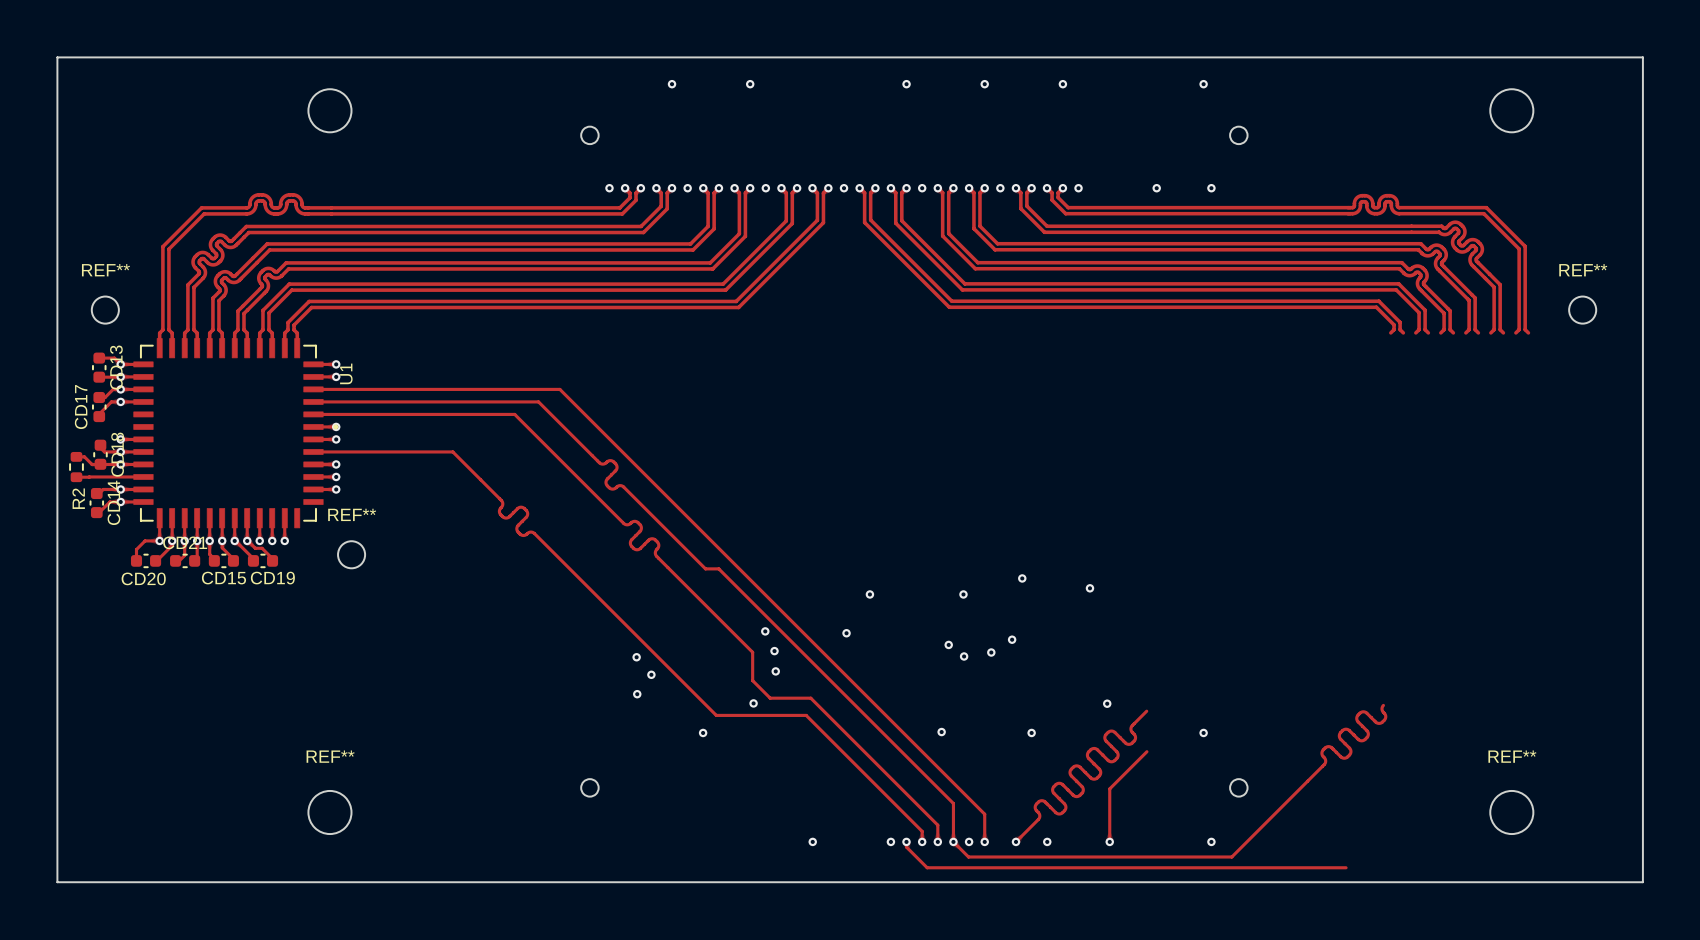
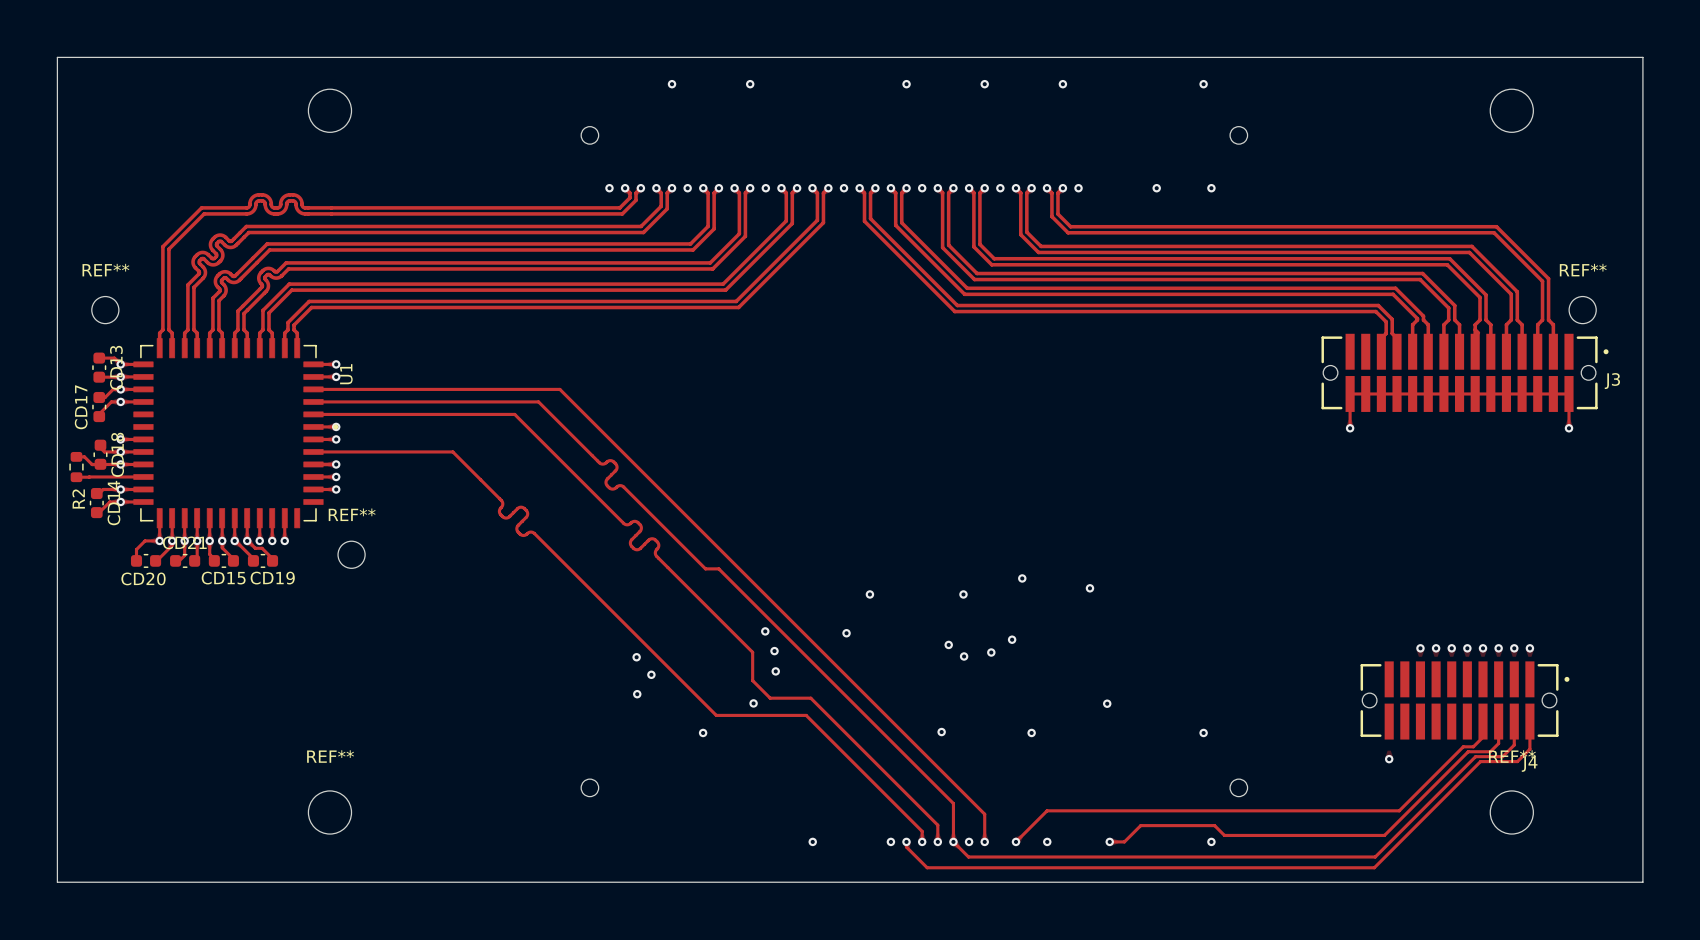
track: (859, 187) (864, 192) (864, 222) (949, 307) (1376, 307) (1394, 324) (1394, 329) (1390, 332) -> (859, 188) (864, 193) (864, 221) (954, 311) (1375, 311) (1386, 321) (1386, 333) (1381, 338) (1381, 351)
track: (875, 187) (870, 192) (870, 220) (951, 301) (1378, 301) (1400, 322) (1400, 329) (1403, 332) -> (875, 188) (870, 193) (870, 218) (957, 305) (1378, 305) (1392, 319) (1392, 333) (1397, 338) (1397, 351)
track: (890, 187) (895, 192) (895, 223) (962, 289) (1396, 289) (1419, 312) (1419, 329) (1415, 332) -> (890, 188) (895, 193) (895, 225) (964, 294) (1393, 294) (1417, 318) (1412, 324) (1412, 351)
track: (906, 187) (901, 192) (901, 220) (964, 283) (1398, 283) (1425, 310) (1425, 329) (1428, 332) -> (906, 188) (901, 193) (901, 222) (967, 288) (1395, 288) (1423, 316) (1423, 319) (1428, 324) (1428, 351)
track: (953, 187) (948, 192) (948, 233) (977, 262) (1401, 262) (1408, 269) (1418, 266) (1425, 270) (1427, 276) (1423, 284) (1450, 310) (1450, 329) (1453, 332) -> (953, 188) (948, 193) (948, 245) (977, 273) (1422, 273) (1454, 305) (1454, 319) (1459, 324) (1459, 351)
track: (1016, 187) (1020, 192) (1020, 208) (1044, 232) (1439, 232) (1444, 234) (1455, 228) (1458, 232) (1453, 239) (1453, 246) (1461, 251) (1466, 250) (1472, 245) (1475, 247) (1470, 257) (1470, 263) (1494, 287) (1494, 329) (1490, 332) -> (1015, 188) (1020, 193) (1020, 234) (1038, 252) (1469, 252) (1511, 294) (1511, 319) (1506, 324) (1506, 351)
track: (1047, 187) (1052, 192) (1052, 200) (1065, 213) (1352, 213) (1358, 210) (1362, 201) (1366, 202) (1369, 211) (1377, 213) (1383, 210) (1386, 201) (1390, 202) (1392, 209) (1398, 213) (1483, 213) (1519, 248) (1519, 329) (1515, 332) -> (1047, 188) (1051, 193) (1051, 216) (1068, 232) (1494, 232) (1542, 281) (1542, 319) (1537, 324) (1537, 351)
track: (1058, 197) (1068, 207) (1352, 207) (1356, 198) (1362, 195) (1369, 197) (1373, 206) (1377, 207) (1380, 198) (1386, 195) (1395, 198) (1399, 207) (1486, 207) (1525, 246) (1525, 329) (1528, 332) -> (1058, 197) (1057, 214) (1070, 226) (1496, 226) (1548, 278) (1548, 319) (1553, 324) (1553, 351)
track: (1026, 206) (1047, 226) (1441, 226) (1444, 228) (1452, 222) (1457, 222) (1464, 230) (1458, 243) (1462, 245) (1472, 239) (1480, 243) (1482, 251) (1476, 260) (1500, 284) (1500, 329) (1503, 332) -> (1026, 206) (1026, 232) (1041, 246) (1471, 246) (1517, 291) (1517, 319) (1522, 324) (1522, 351)
track: (979, 226) (997, 243) (1420, 243) (1427, 249) (1433, 245) (1438, 245) (1446, 253) (1441, 264) (1475, 297) (1475, 324) -> (973, 228) (973, 246) (991, 264) (1447, 264) (1479, 297) (1479, 319) (1475, 324)
track: none -> (979, 226) (979, 244) (994, 258) (1449, 258) (1486, 294) (1486, 319) (1490, 324) (1490, 351)
track: (973, 228) (995, 249) (1418, 249) (1427, 255) (1437, 251) (1440, 254) (1435, 261) (1436, 267) (1469, 300) (1469, 329) (1465, 332) -> none
track: (942, 236) (975, 268) (1399, 268) (1409, 275) (1417, 272) (1421, 275) (1417, 281) (1418, 287) (1444, 313) (1444, 329) (1440, 332) -> (942, 236) (942, 247) (974, 279) (1420, 279) (1448, 308) (1448, 319) (1443, 324) (1443, 351)
J3: none -> (1465, 372)
track: none -> (1350, 428) (1350, 393) (1569, 393) (1569, 428)
via: none -> (1350, 428)
via: none -> (1569, 428)
via: none -> (1420, 648)
via: none -> (1436, 648)
via: none -> (1451, 648)
via: none -> (1467, 648)
via: none -> (1483, 648)
via: none -> (1498, 648)
via: none -> (1514, 648)
via: none -> (1529, 648)
J4: none -> (1465, 700)
track: (1383, 705) (1382, 709) (1385, 717) (1380, 723) (1376, 722) (1364, 711) (1357, 716) (1357, 720) (1368, 732) (1365, 739) (1360, 740) (1348, 729) (1342, 730) (1339, 737) (1350, 748) (1349, 754) (1343, 758) (1331, 747) (1325, 747) (1321, 753) (1325, 759) (1324, 764) (1231, 856) -> (1514, 721) (1514, 745) (1502, 756) (1475, 756) (1375, 856) (1231, 856)
track: (1146, 711) (1131, 727) (1135, 737) (1131, 743) (1125, 743) (1113, 731) (1109, 731) (1105, 735) (1105, 740) (1117, 753) (1117, 756) (1114, 760) (1109, 761) (1095, 748) (1088, 752) (1088, 757) (1100, 771) (1097, 778) (1091, 778) (1078, 766) (1071, 769) (1070, 775) (1083, 788) (1079, 795) (1074, 795) (1061, 783) (1054, 786) (1053, 792) (1064, 804) (1065, 809) (1061, 813) (1057, 813) (1044, 801) (1039, 801) (1035, 806) (1039, 814) (1038, 819) -> (1483, 721) (1483, 737) (1473, 746) (1463, 746) (1399, 810) (1047, 810) (1038, 819)
track: none -> (1529, 721) (1529, 749) (1517, 761) (1480, 761) (1374, 867) (1346, 867)
track: (1146, 751) (1109, 788) (1109, 841) -> (1498, 721) (1498, 743) (1490, 751) (1468, 751) (1384, 835) (1224, 835) (1214, 825) (1140, 825) (1124, 841) (1109, 841)
via: none -> (1389, 759)

